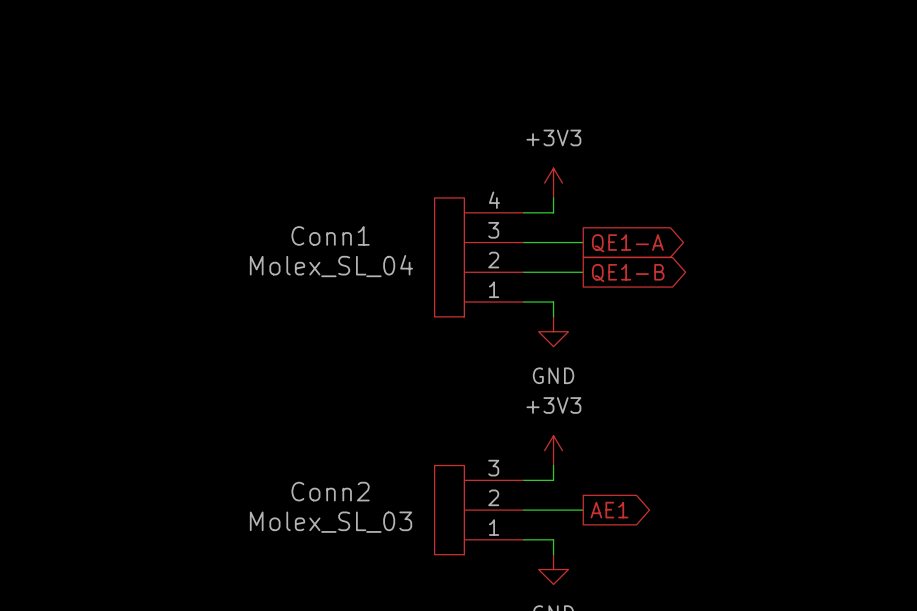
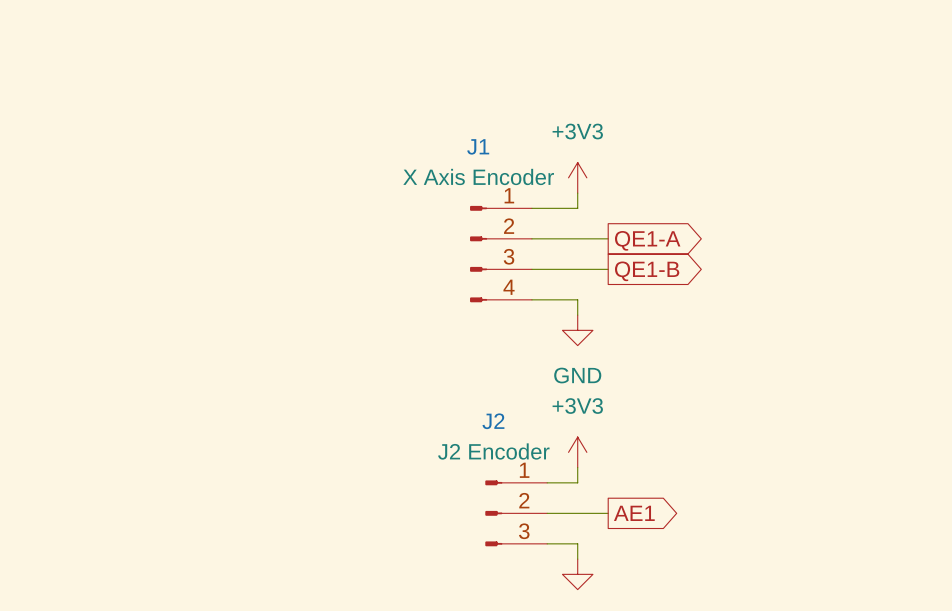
J1: none -> X Axis Encoder (500, 254)
Conn1: Molex_SL_04 (479, 257) -> none
Conn2: Molex_SL_03 (479, 510) -> none
J2: none -> J2 Encoder (516, 513)

